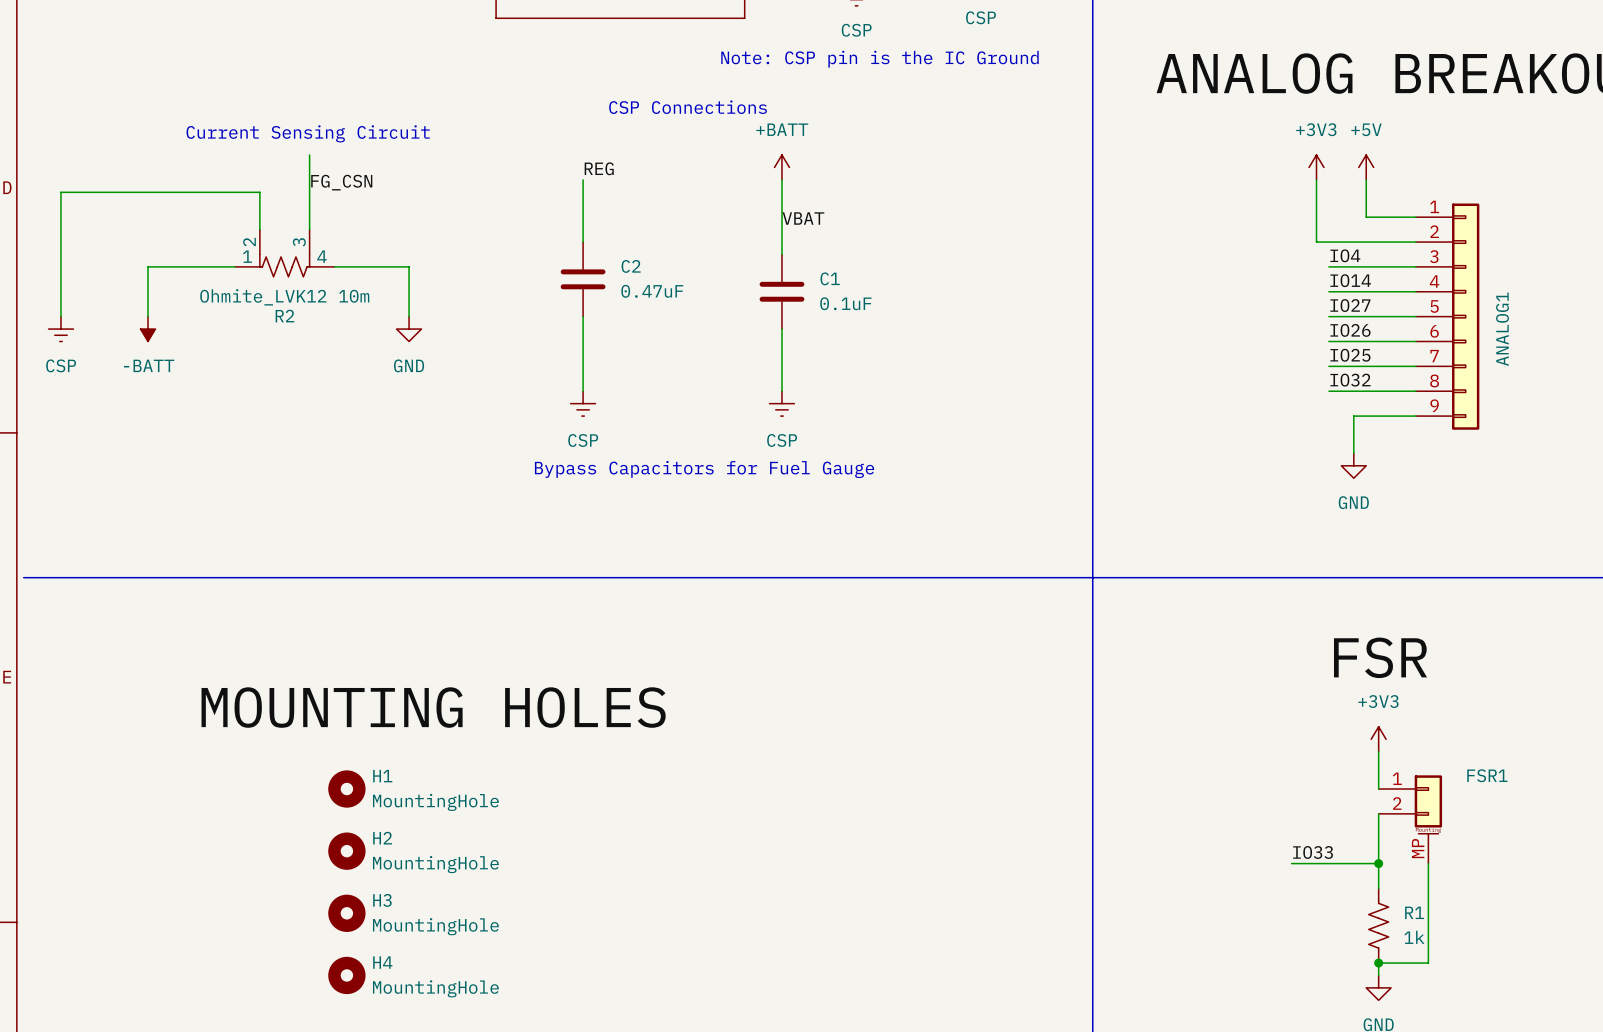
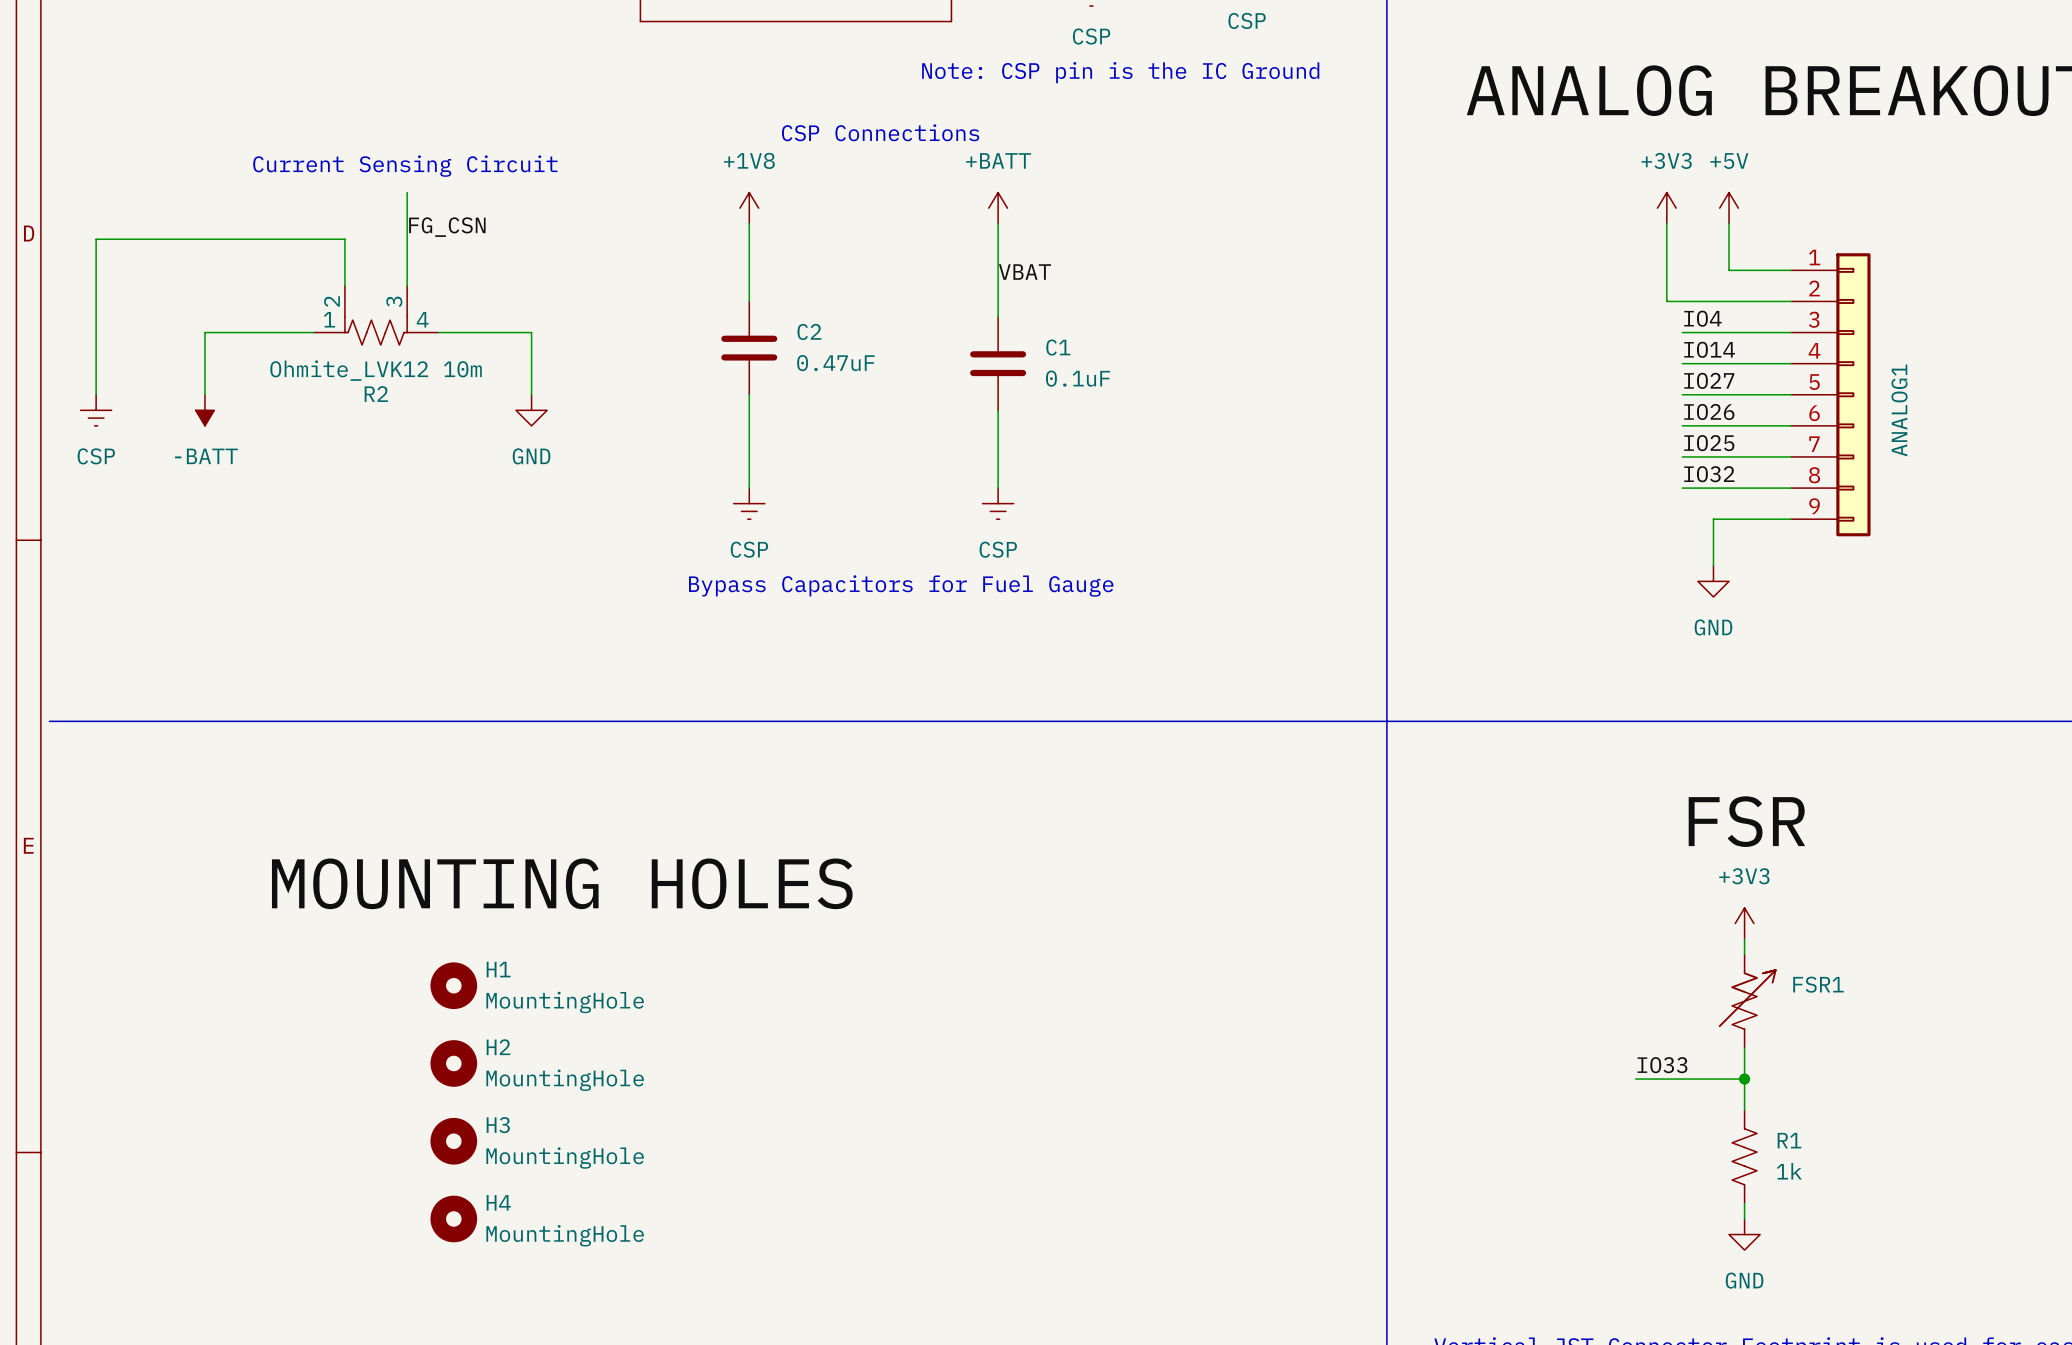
power symbol: none -> +1V8 (749, 208)
label: REG (599, 168) -> none
FSR1 symbol: [1378, 775, 1443, 864] -> [1718, 954, 1777, 1048]
FSR1 name position: FSR1 (1487, 775) -> FSR1 (1818, 984)
wire: (1428, 863) (1428, 963) (1378, 963) -> none
junction: (1378, 963) -> none

